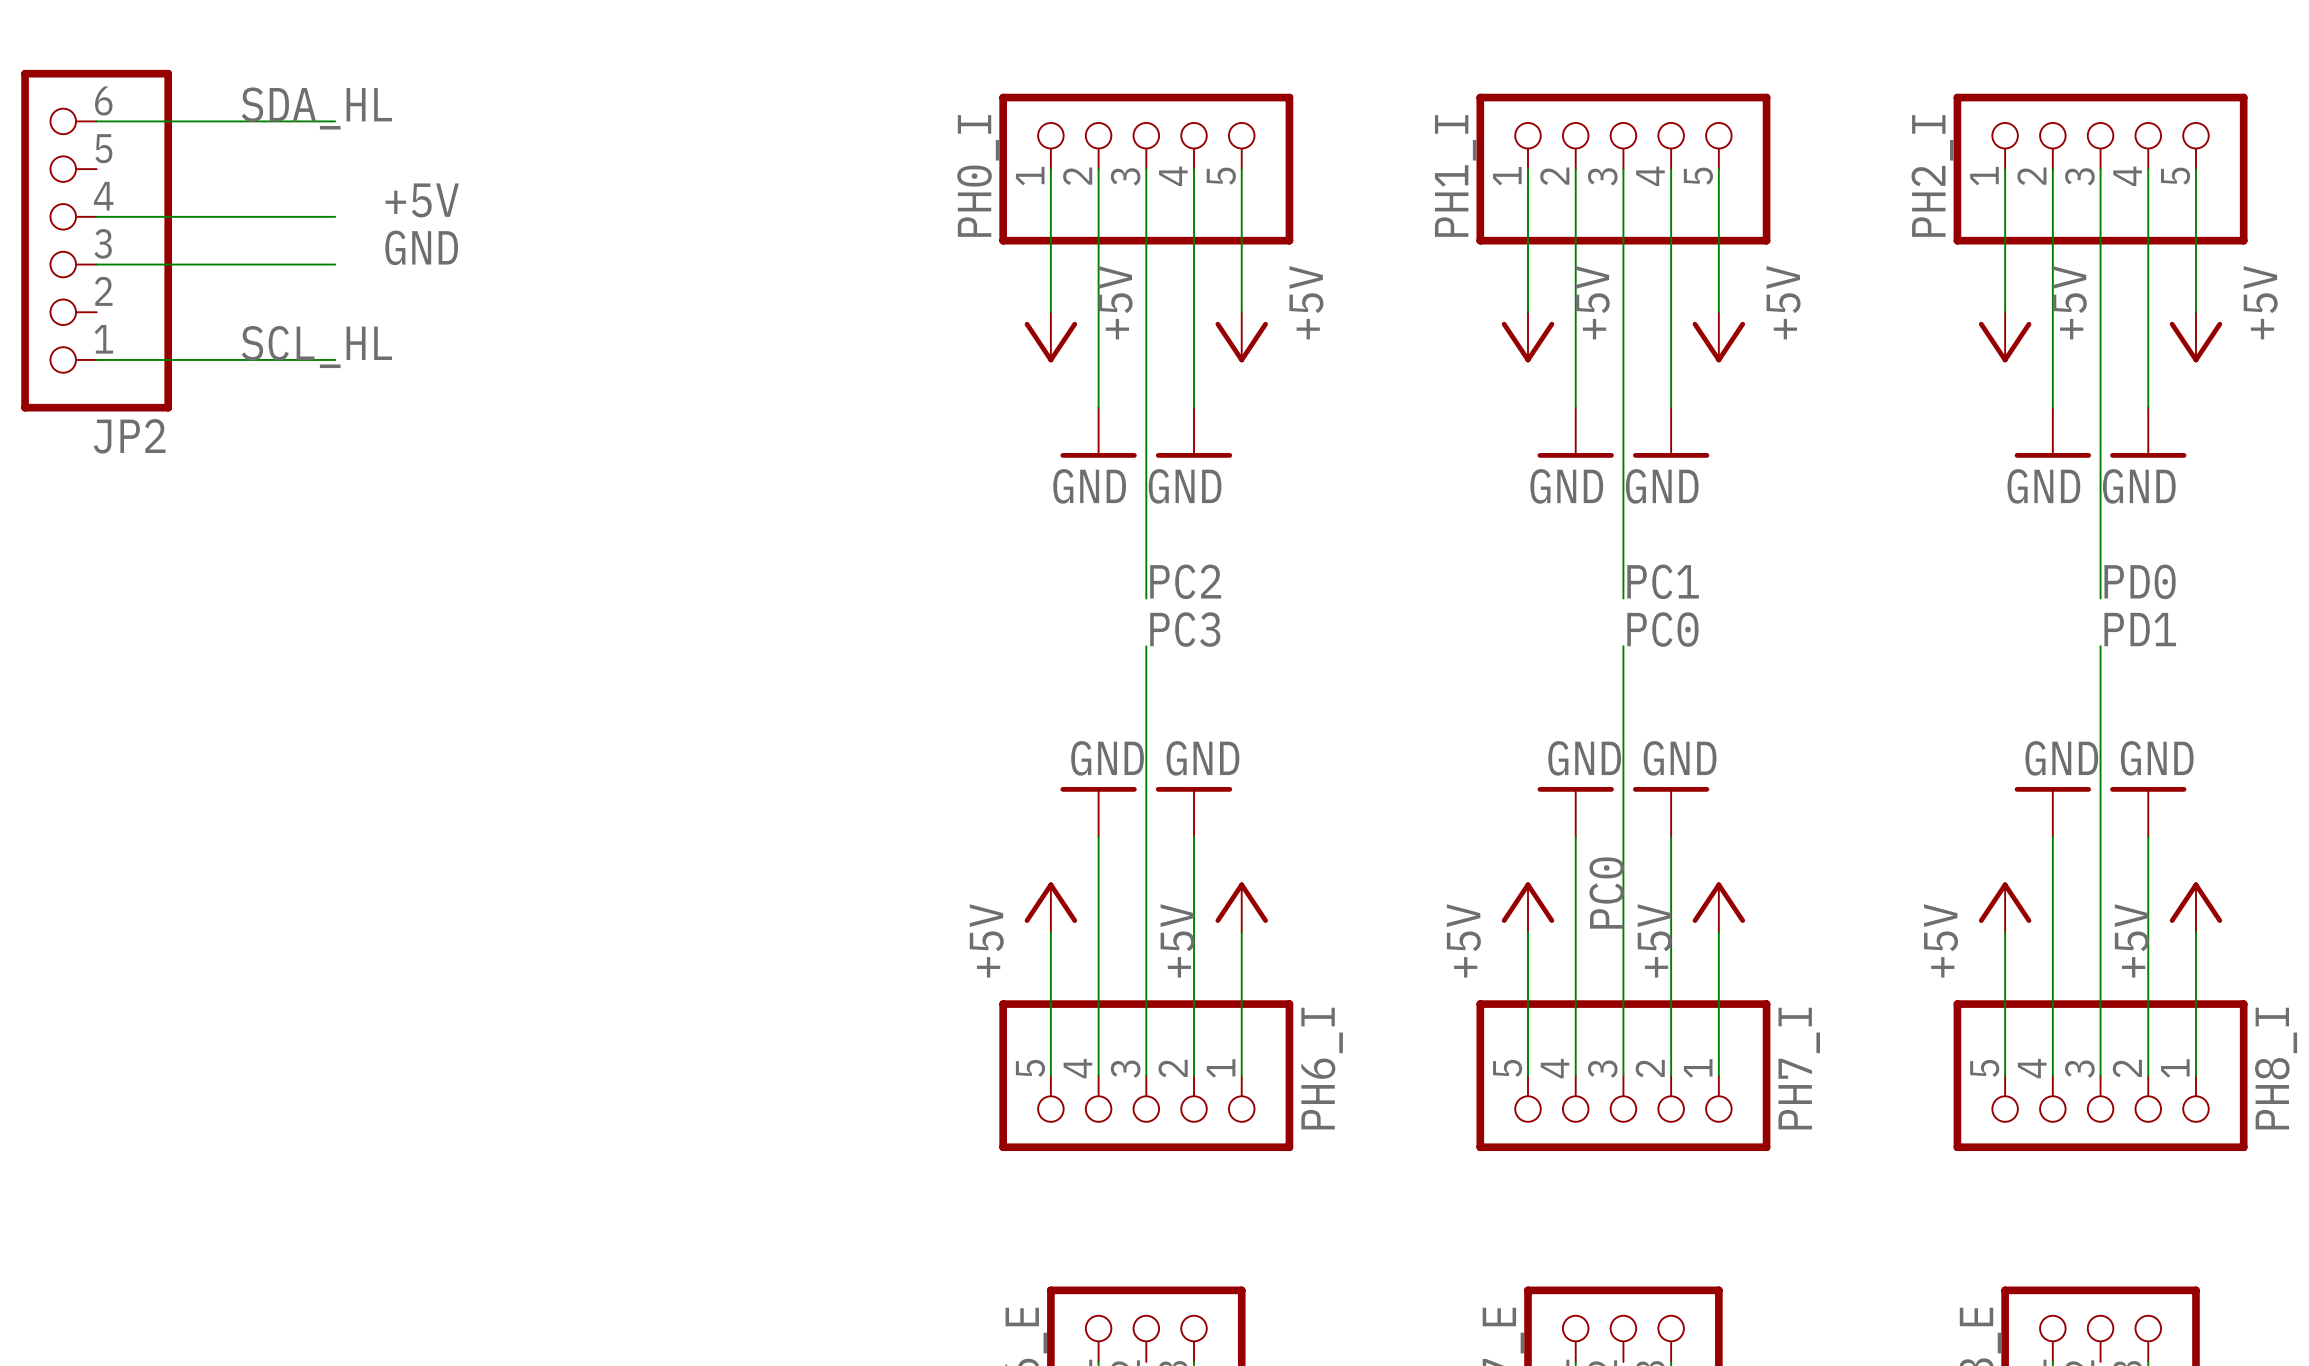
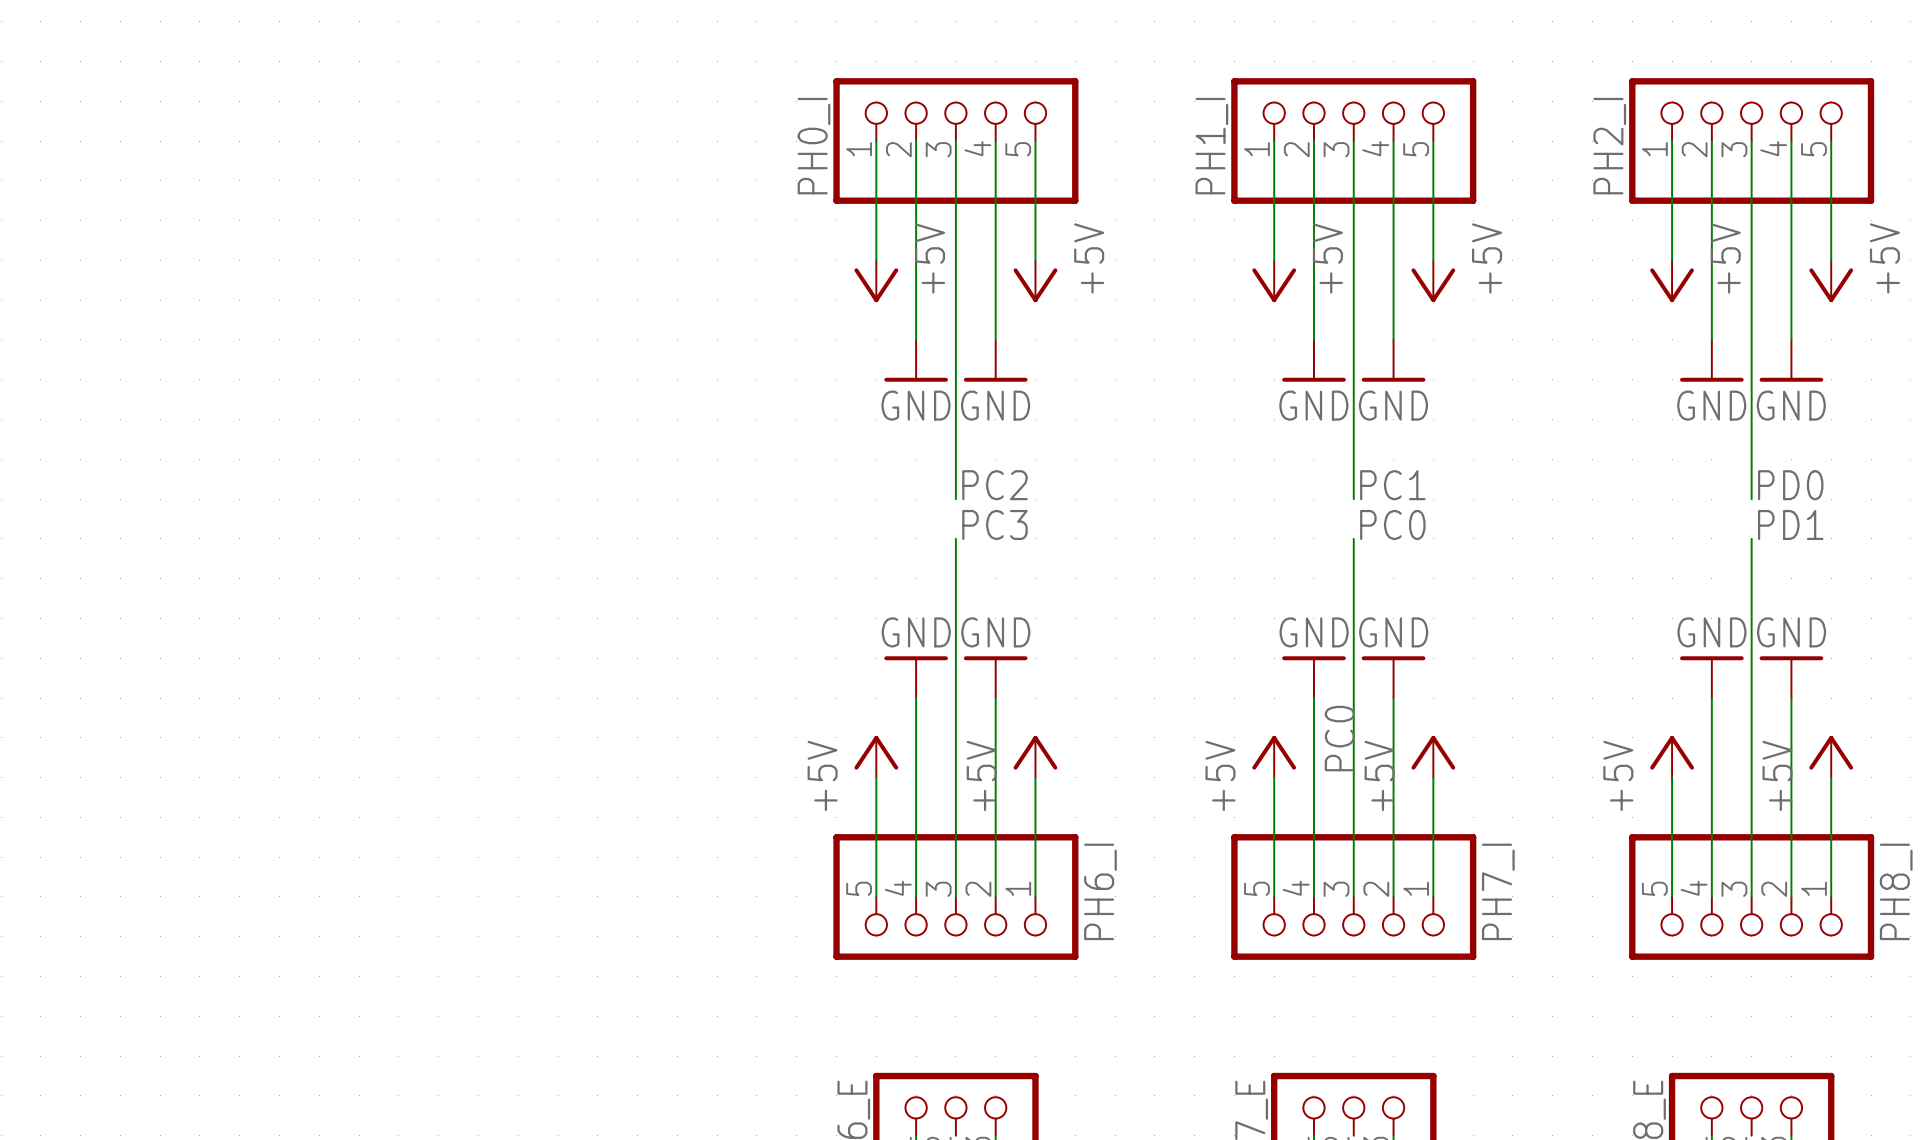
label: SDA_HL (316, 108) -> none
wire: (96, 121) (335, 121) -> none
label: +5V (422, 200) -> none
wire: (96, 216) (335, 216) -> none
JP2: (96, 240) -> none
label: GND (421, 247) -> none
wire: (96, 264) (335, 264) -> none
label: SCL_HL (316, 347) -> none
wire: (96, 359) (335, 359) -> none

